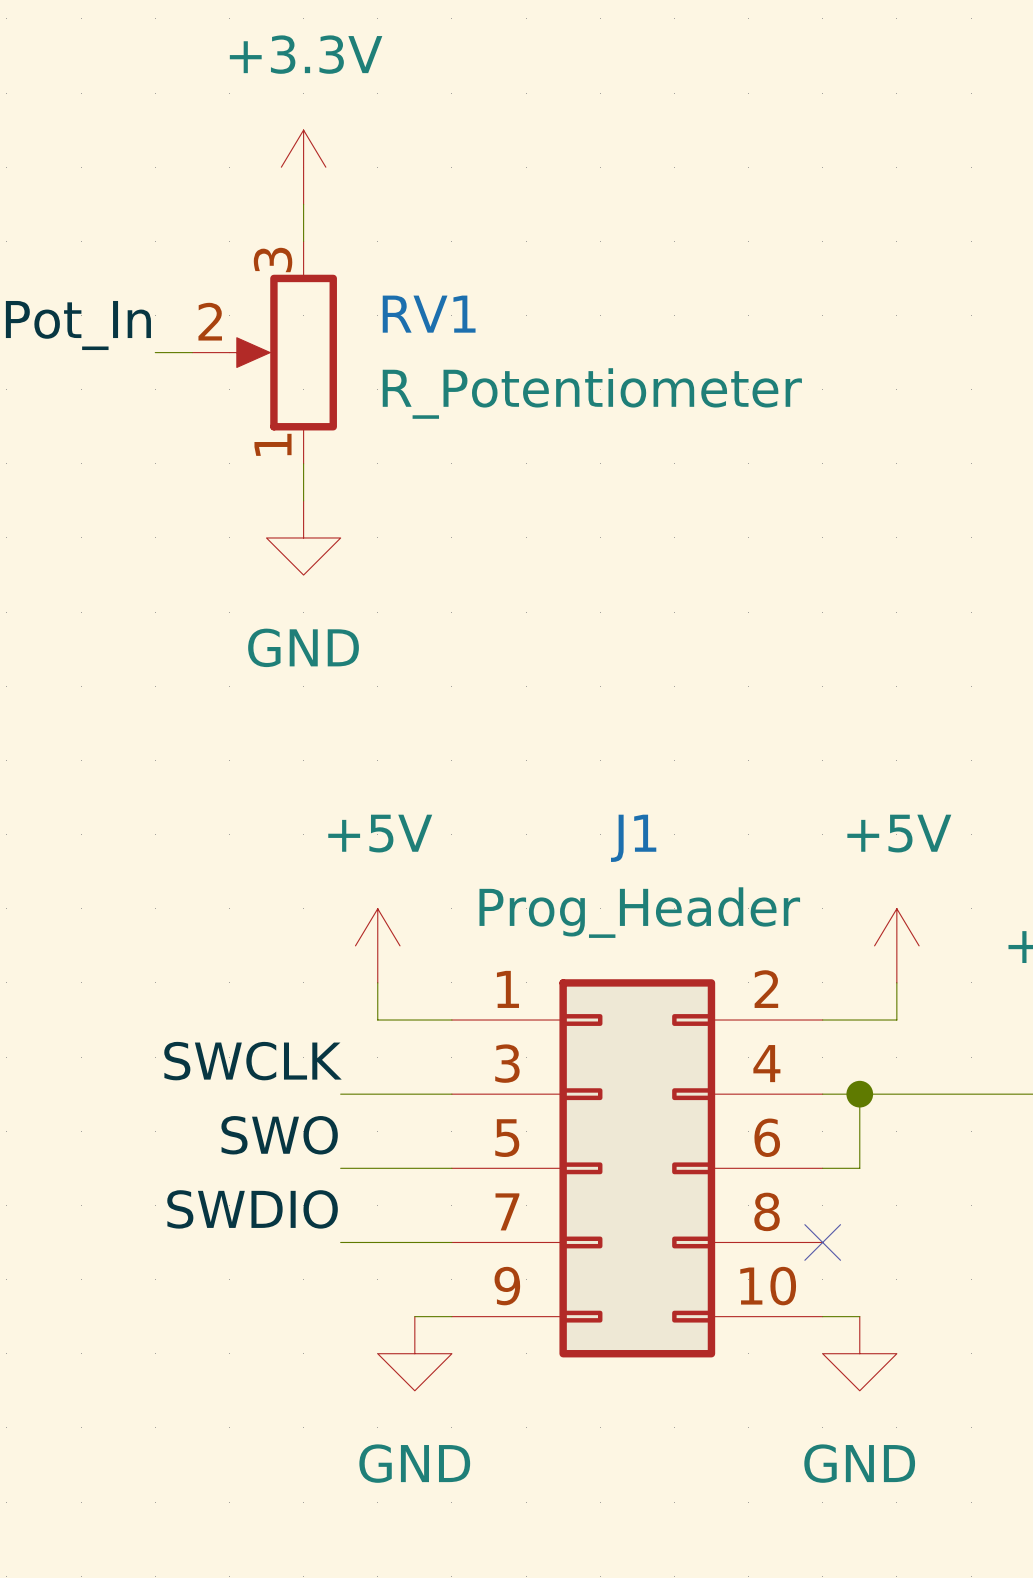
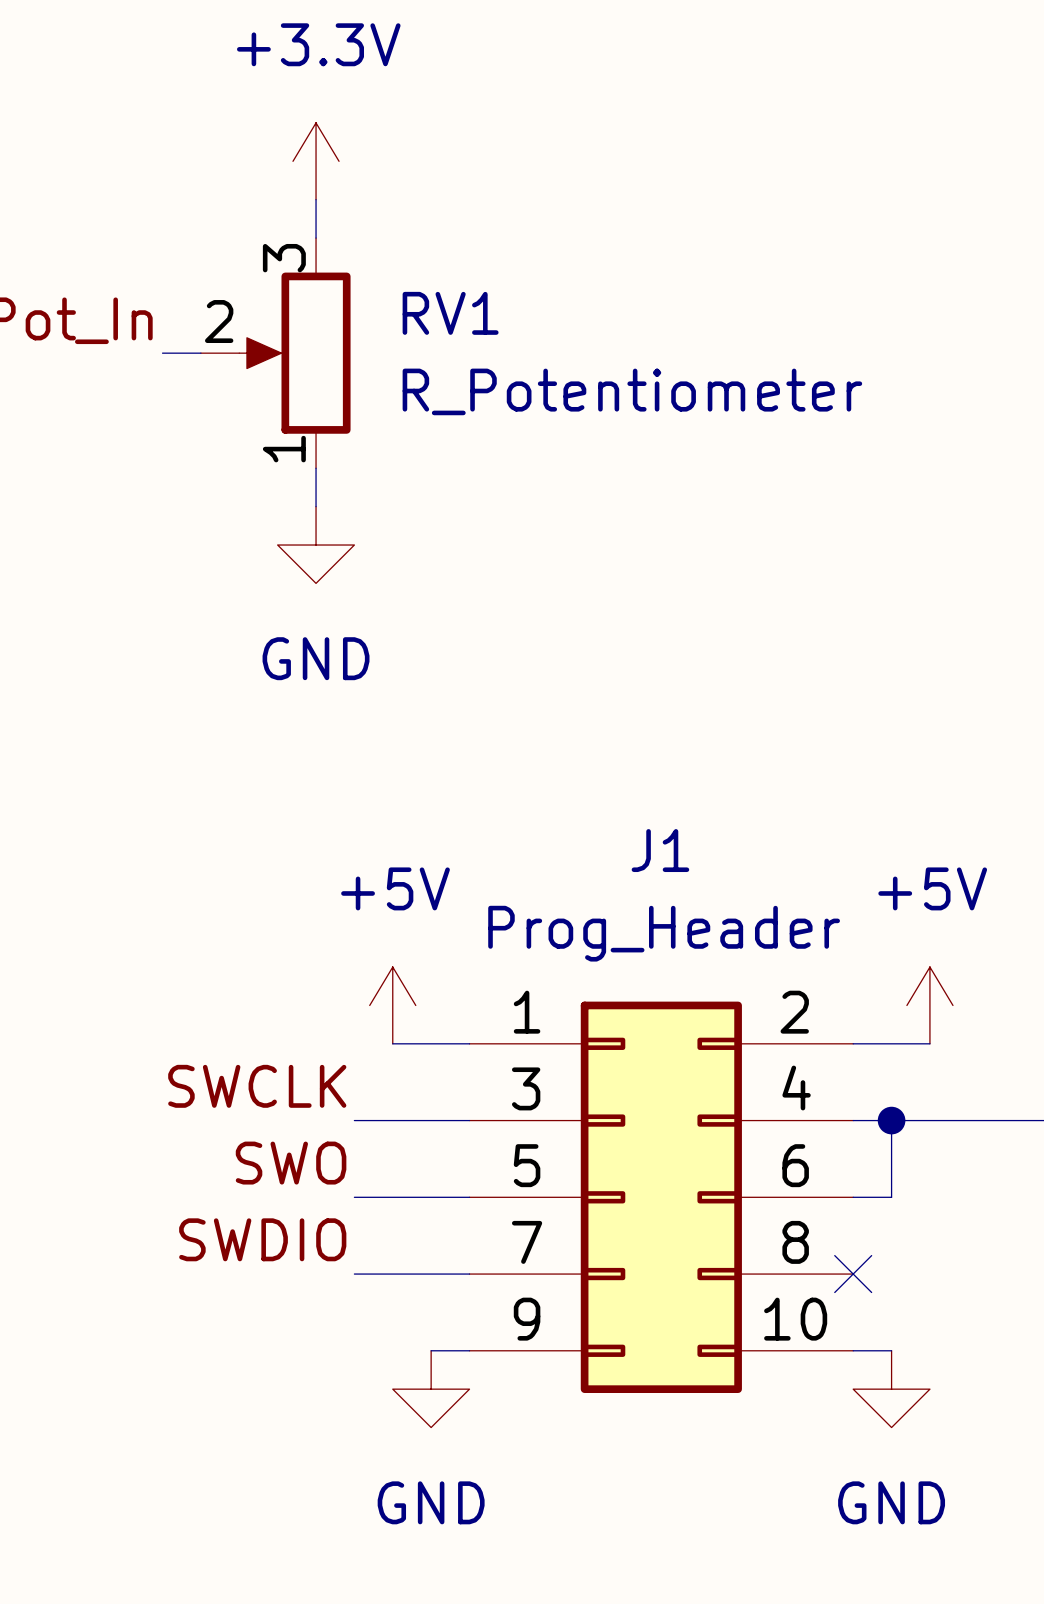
power symbol position: +5V (377, 945) -> +5V (392, 1005)
power symbol position: +5V (896, 945) -> +5V (929, 1005)

